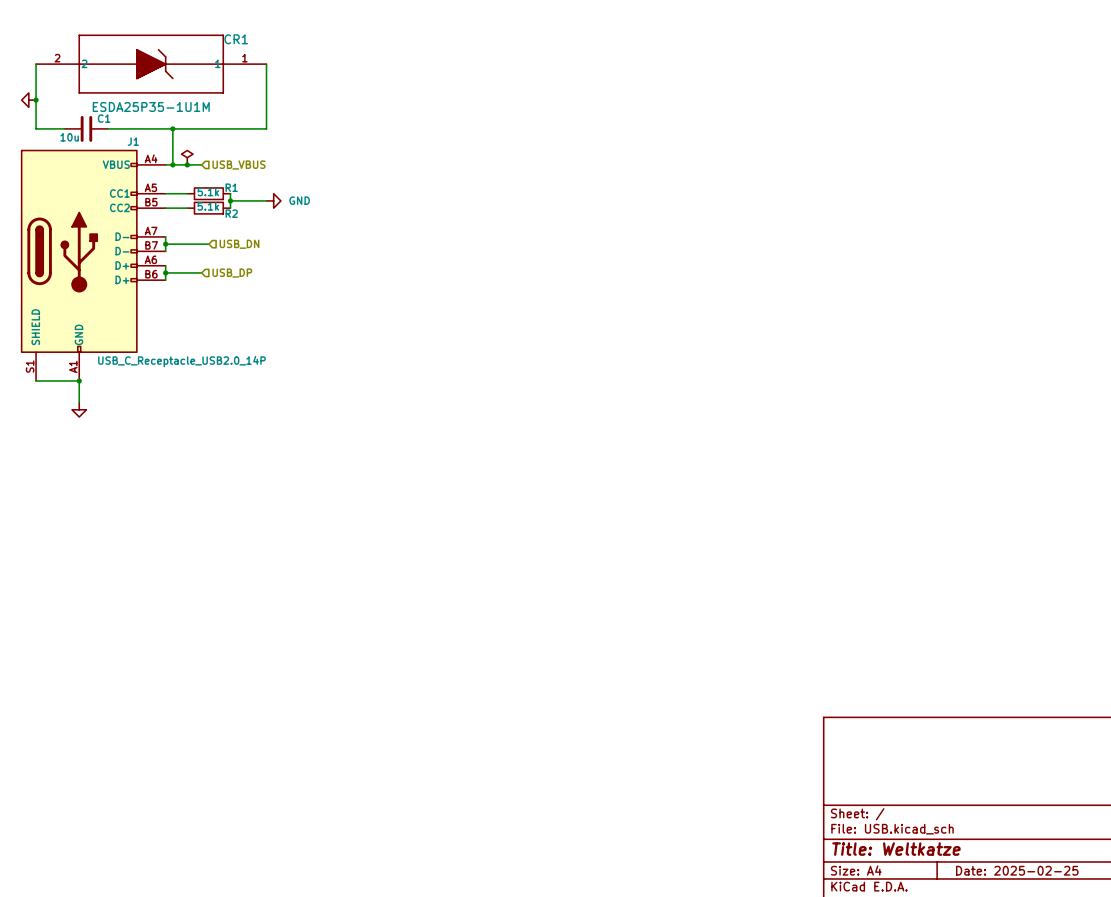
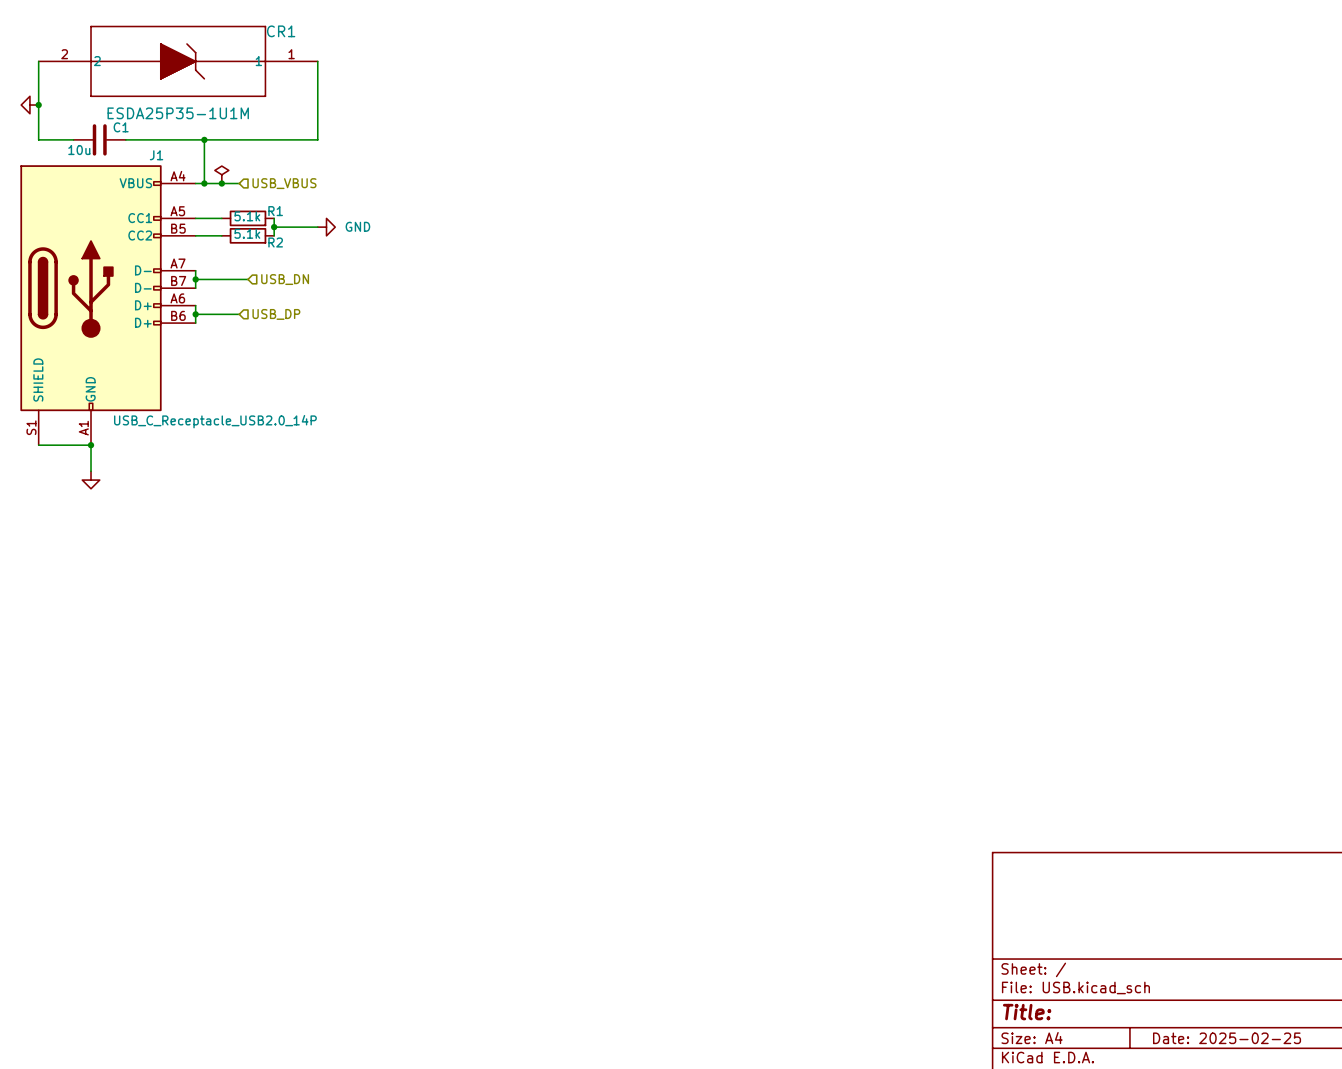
title block: Title: Weltkatze (896, 849) -> Title: (1027, 1012)

